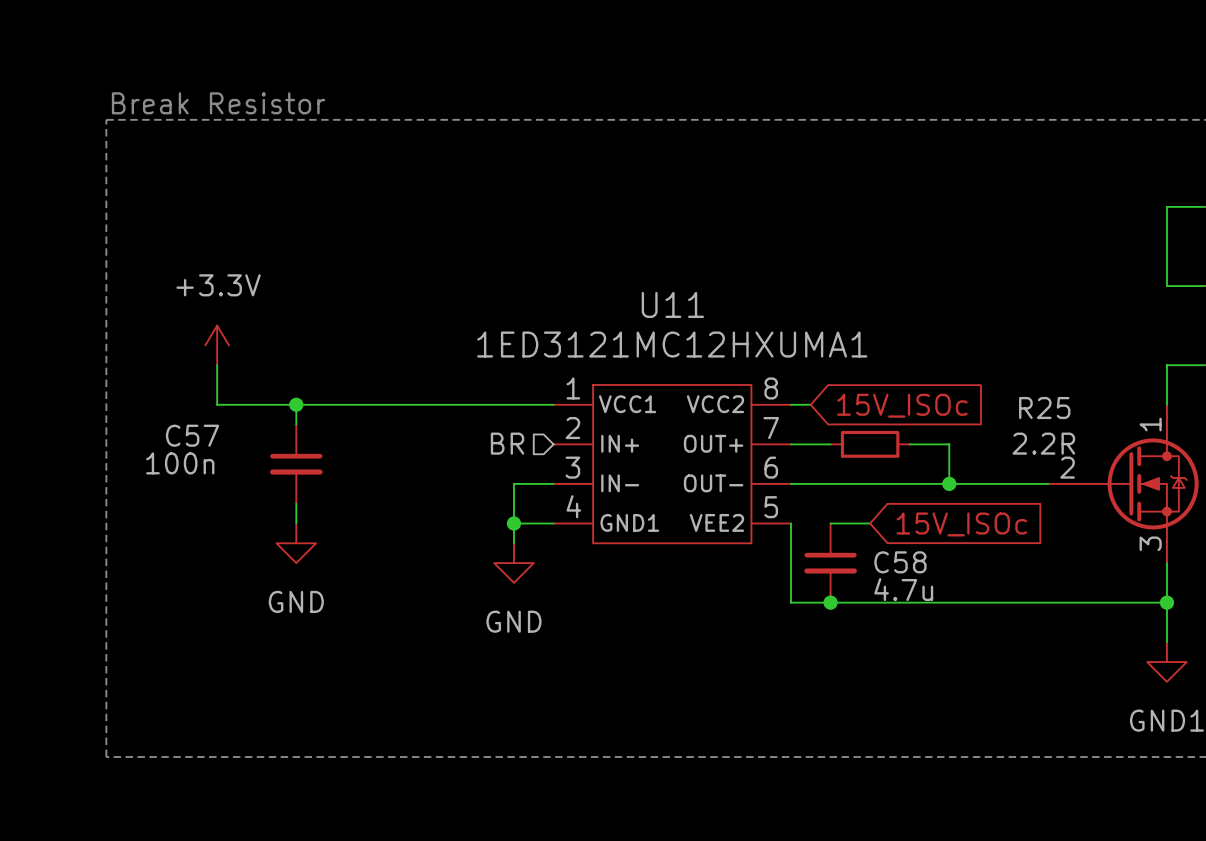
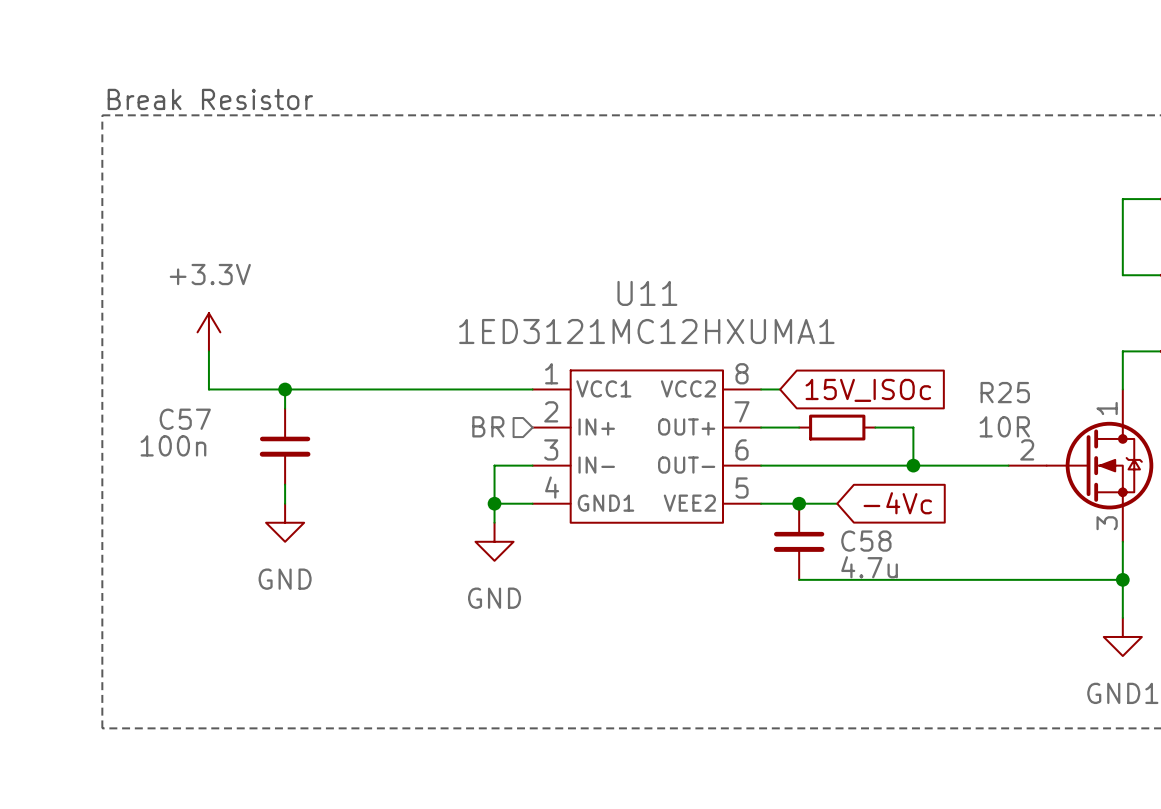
R25 value: 2.2R (1043, 443) -> 10R (1004, 426)
wire: (791, 523) (791, 602) (830, 602) -> (761, 503) (799, 503)
global label: 15V_ISOc (961, 524) -> -4Vc (897, 503)
junction position: (830, 602) -> (799, 503)

